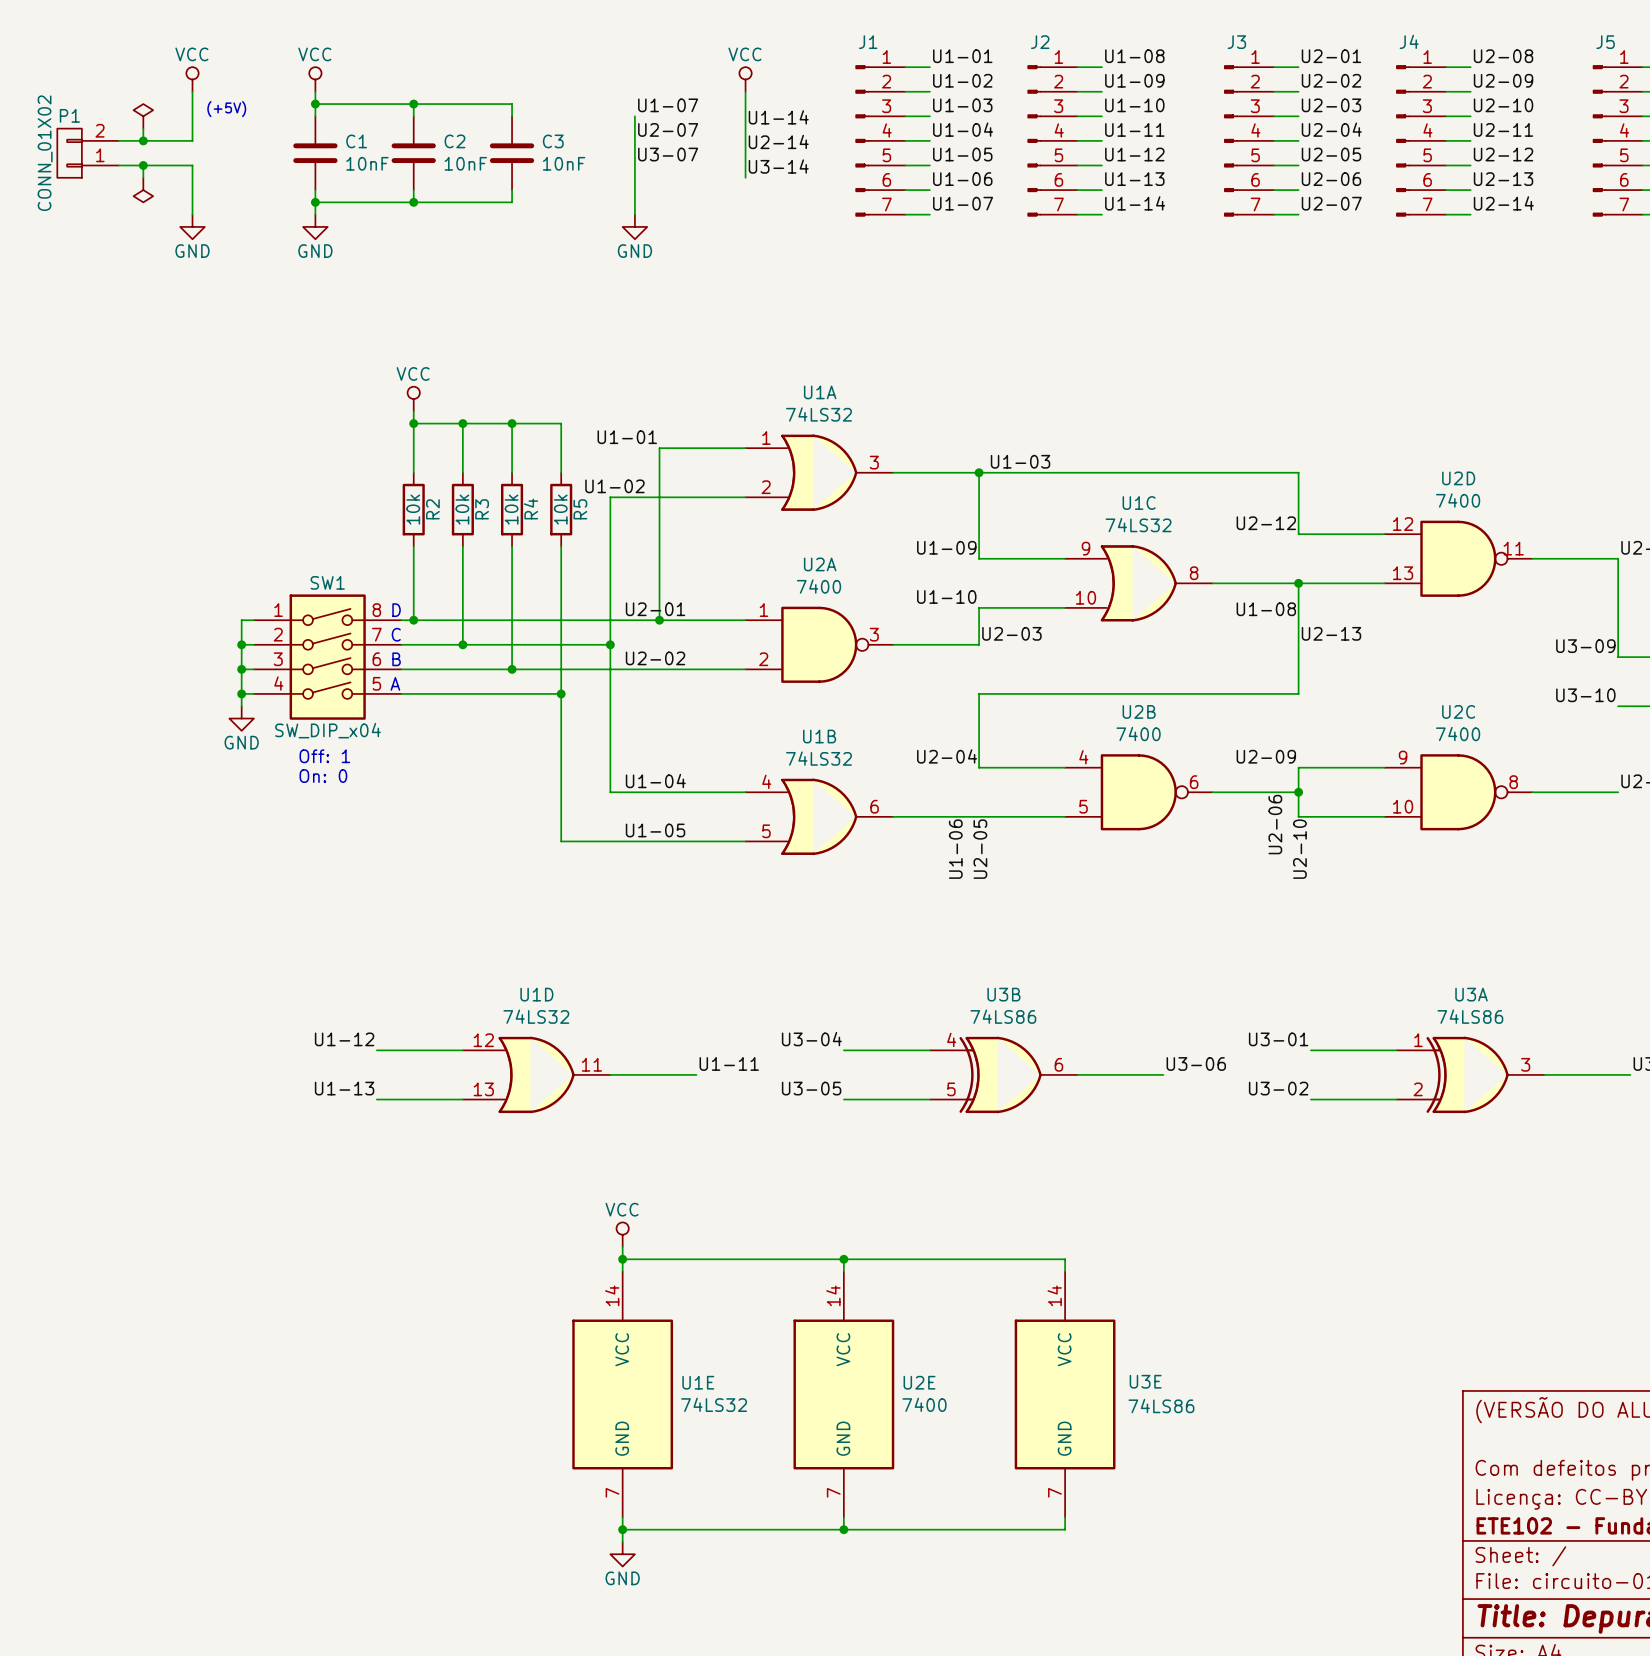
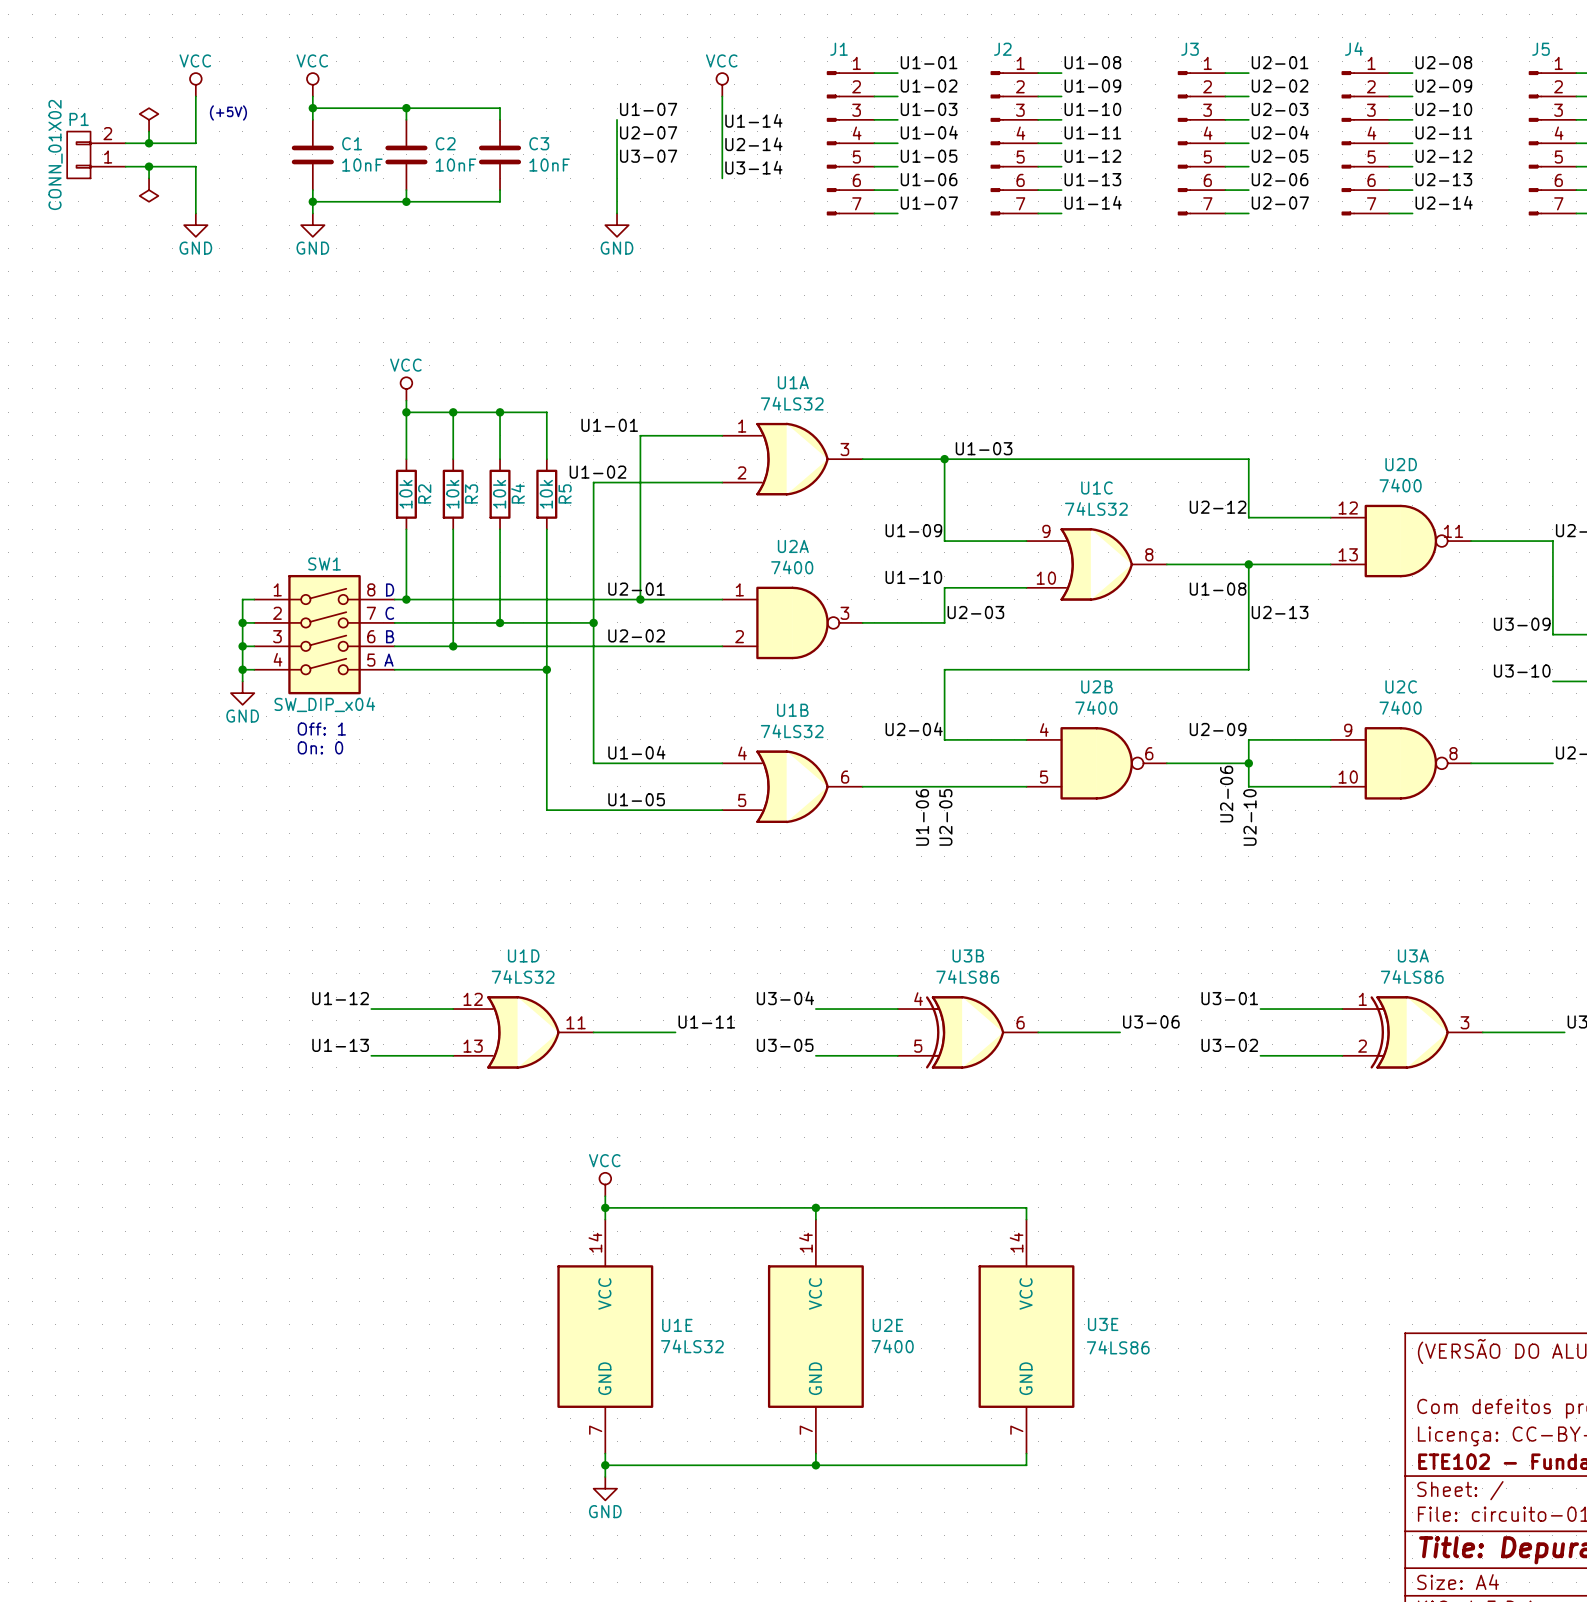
junction: (462, 644) -> none
wire: (512, 644) (512, 669) -> (453, 622) (453, 646)
junction: none -> (500, 622)
junction: none -> (453, 646)
junction: (512, 669) -> none

